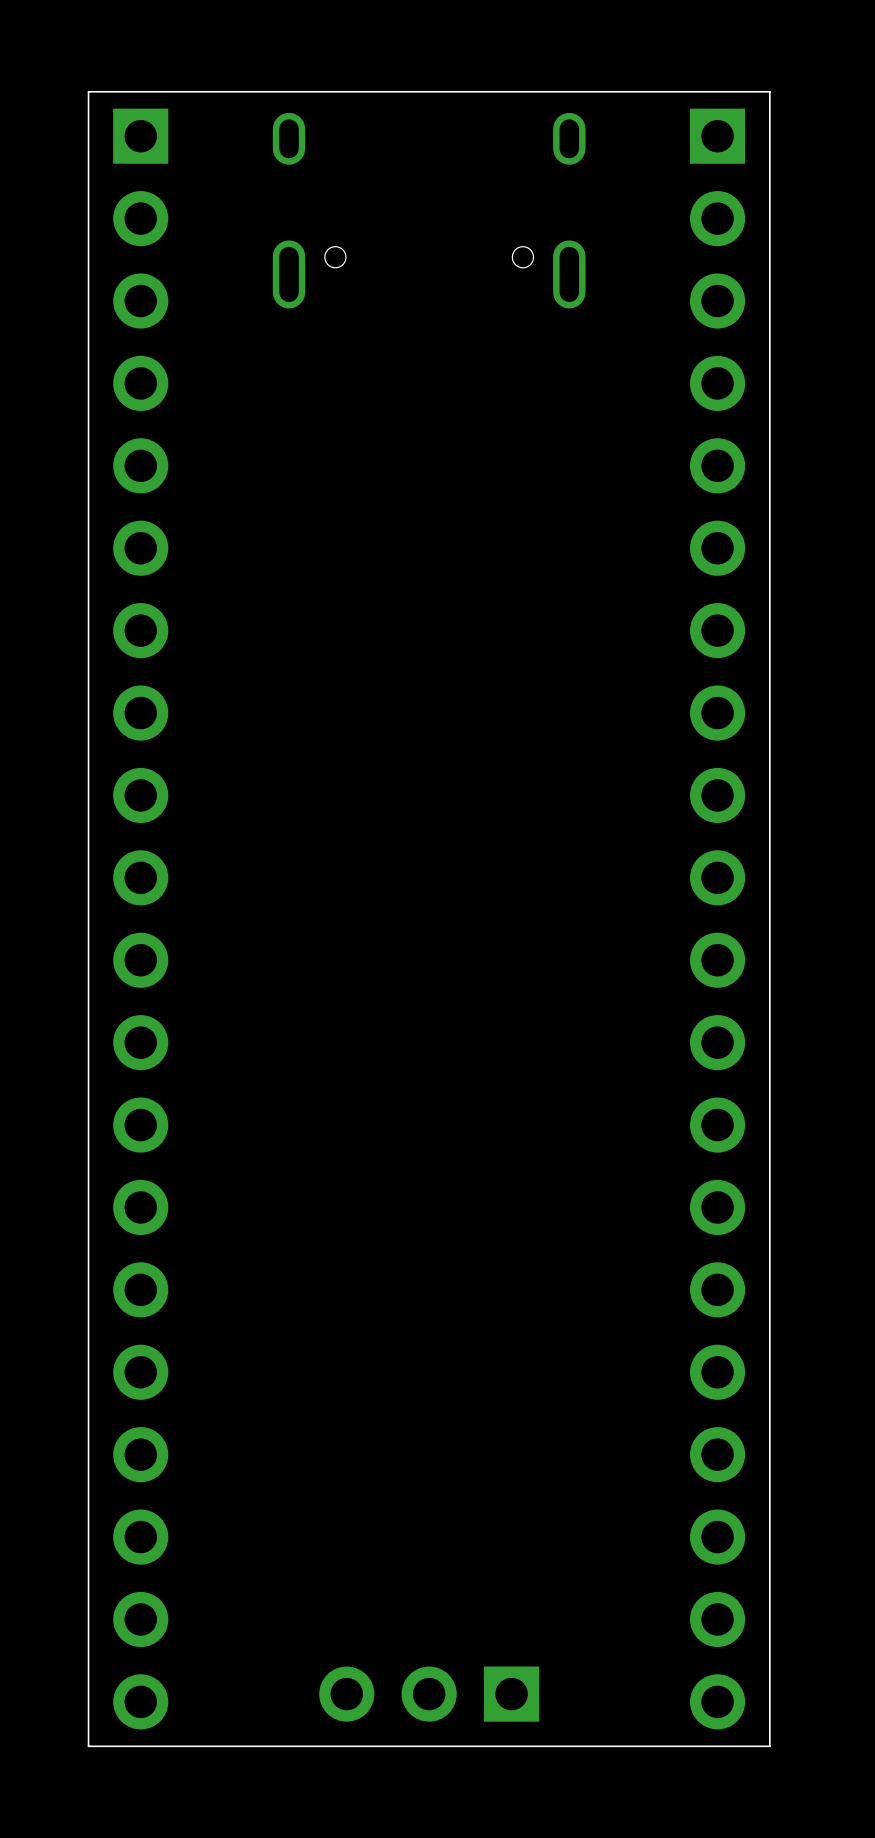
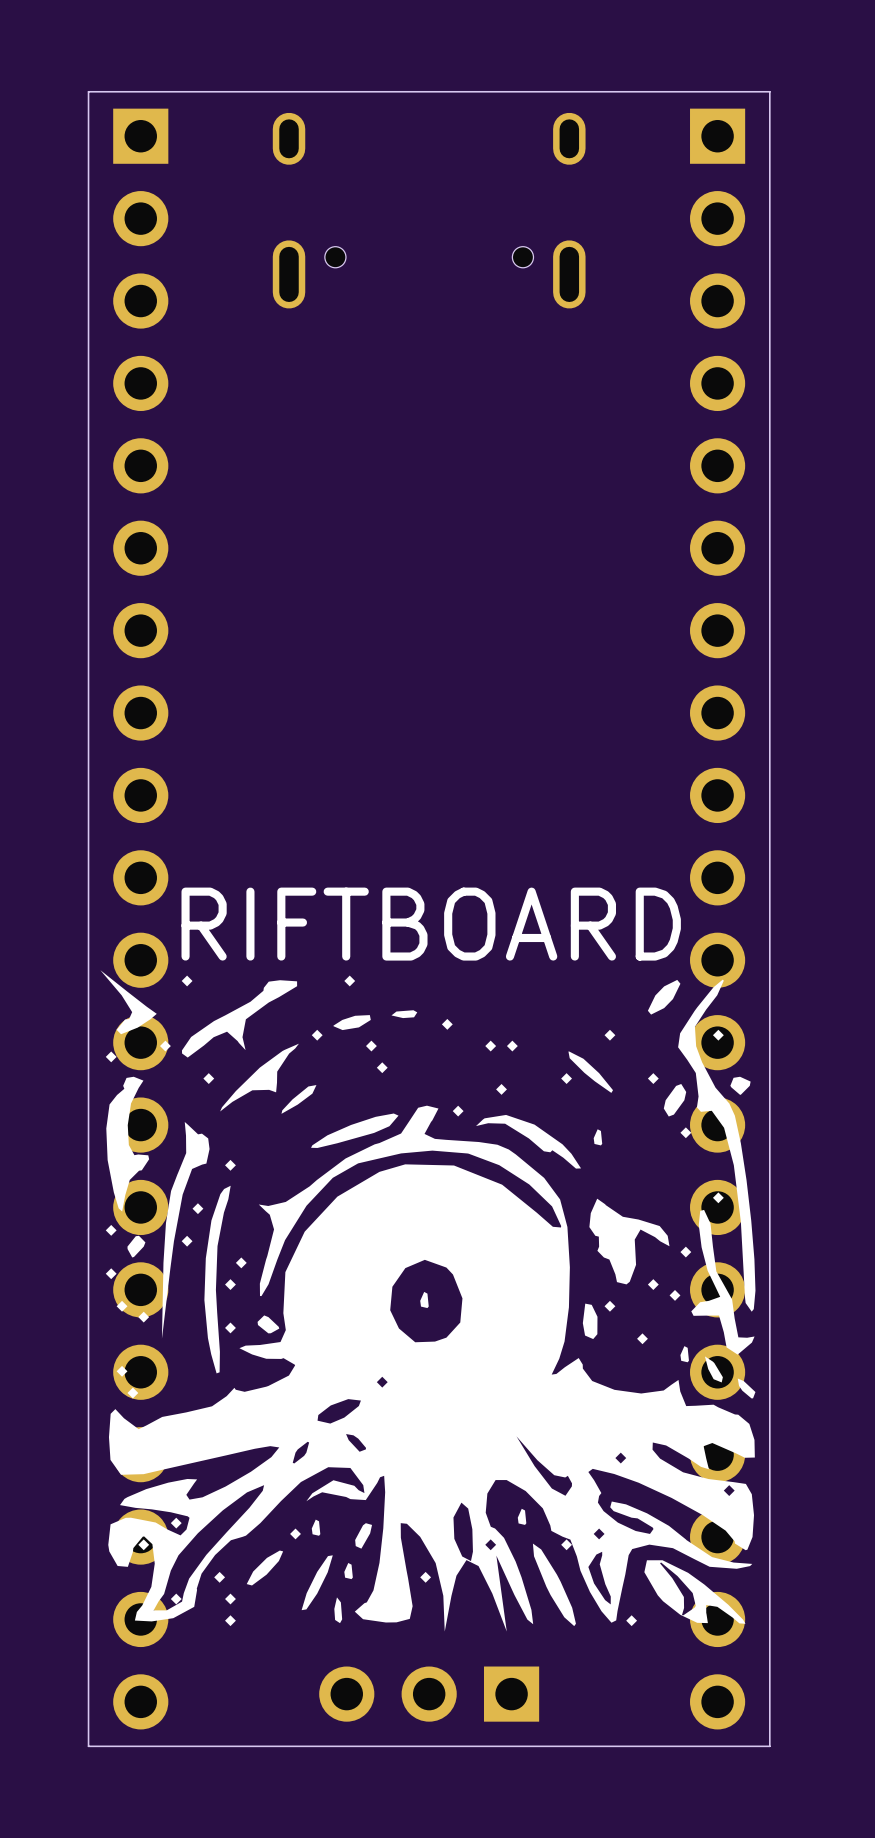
text: none -> RIFTBOARD (431, 924)
drawing: none -> [100, 970, 756, 1632]

